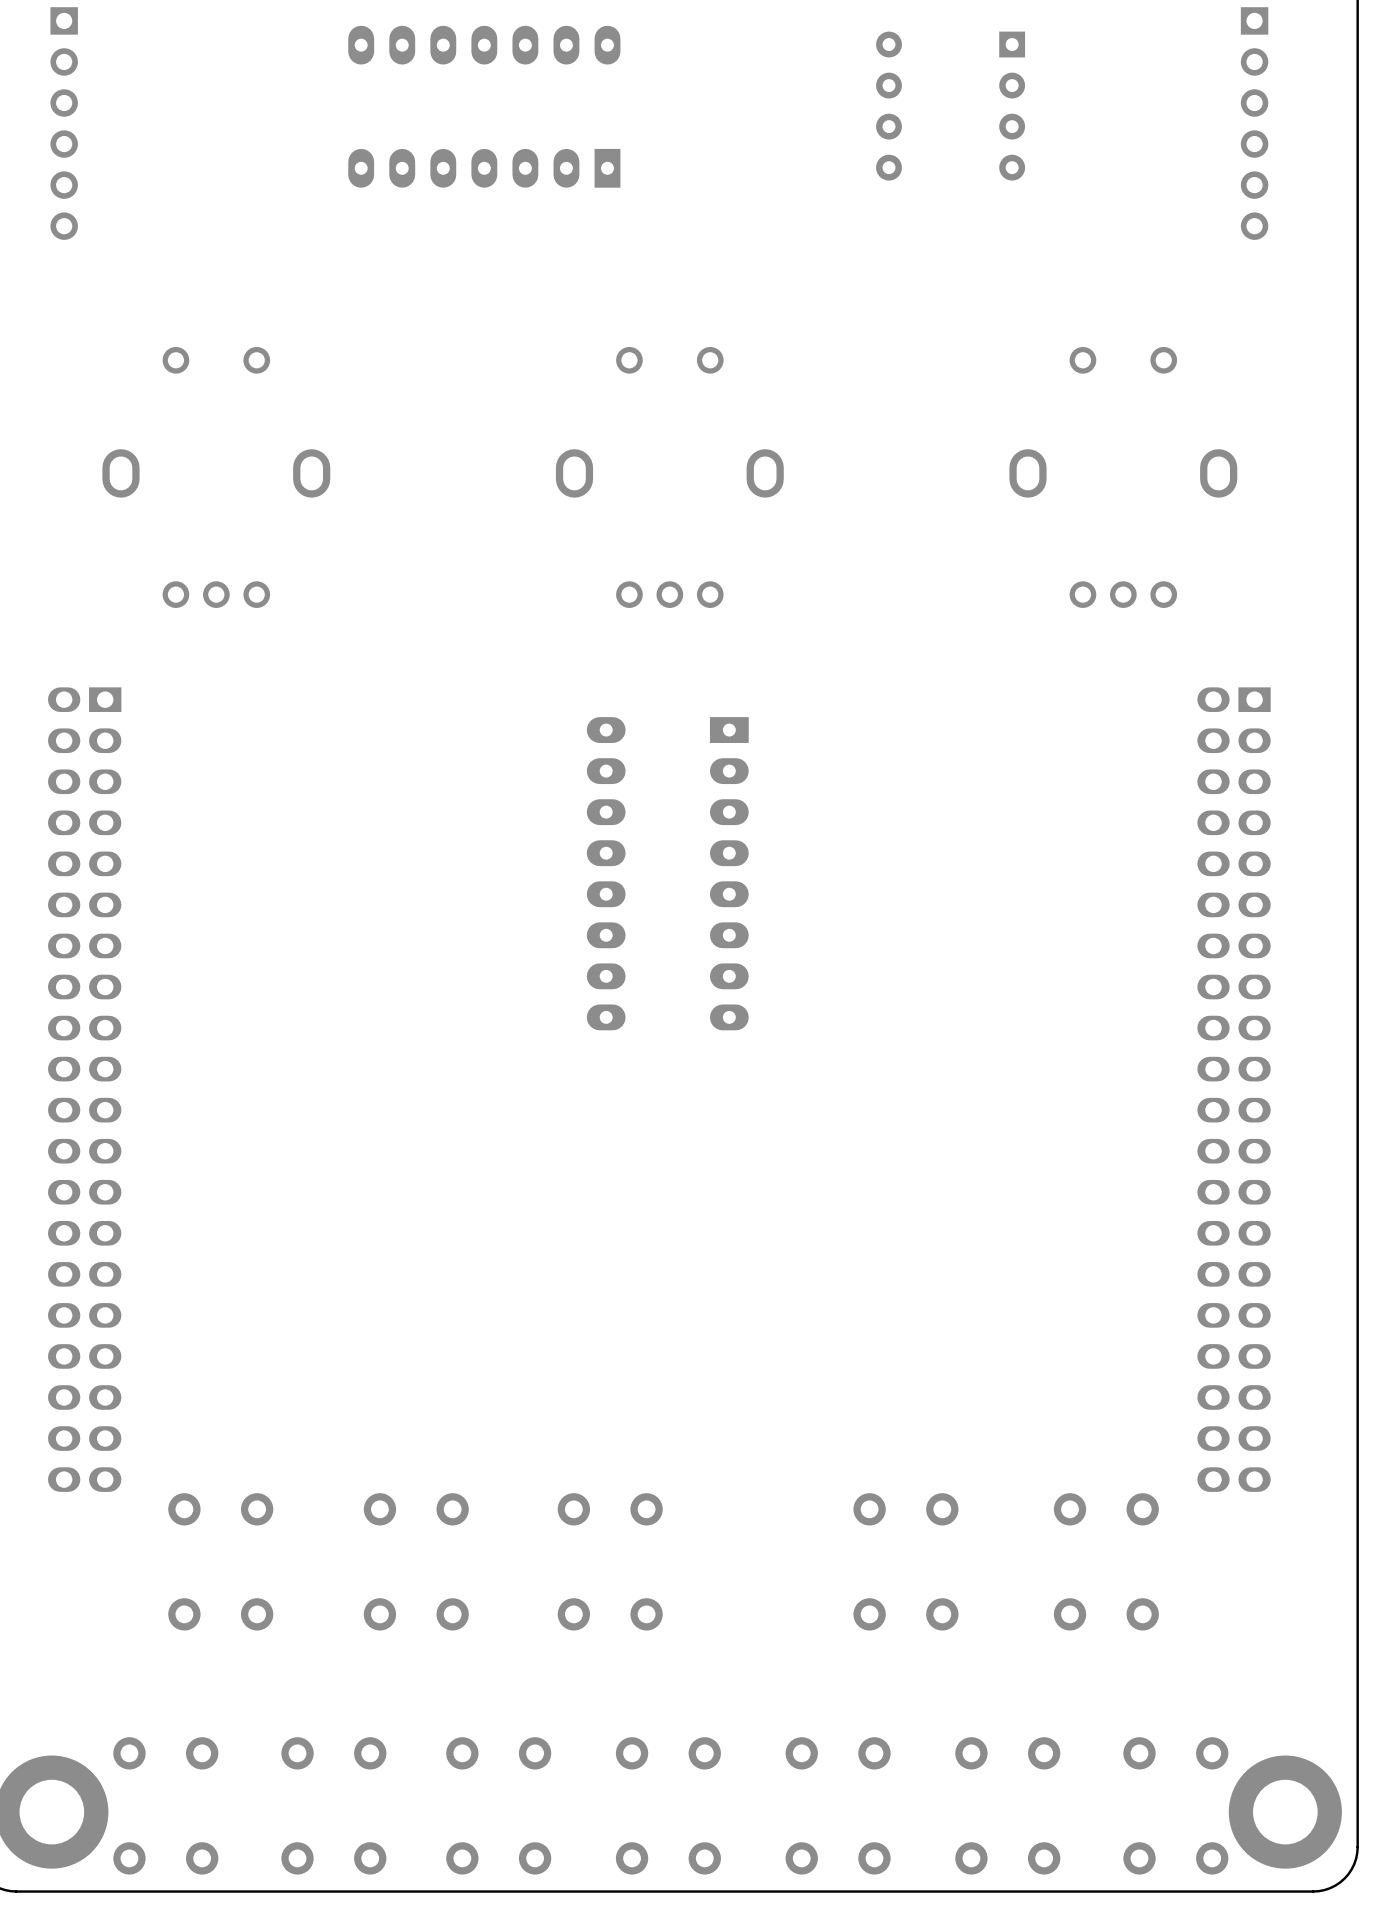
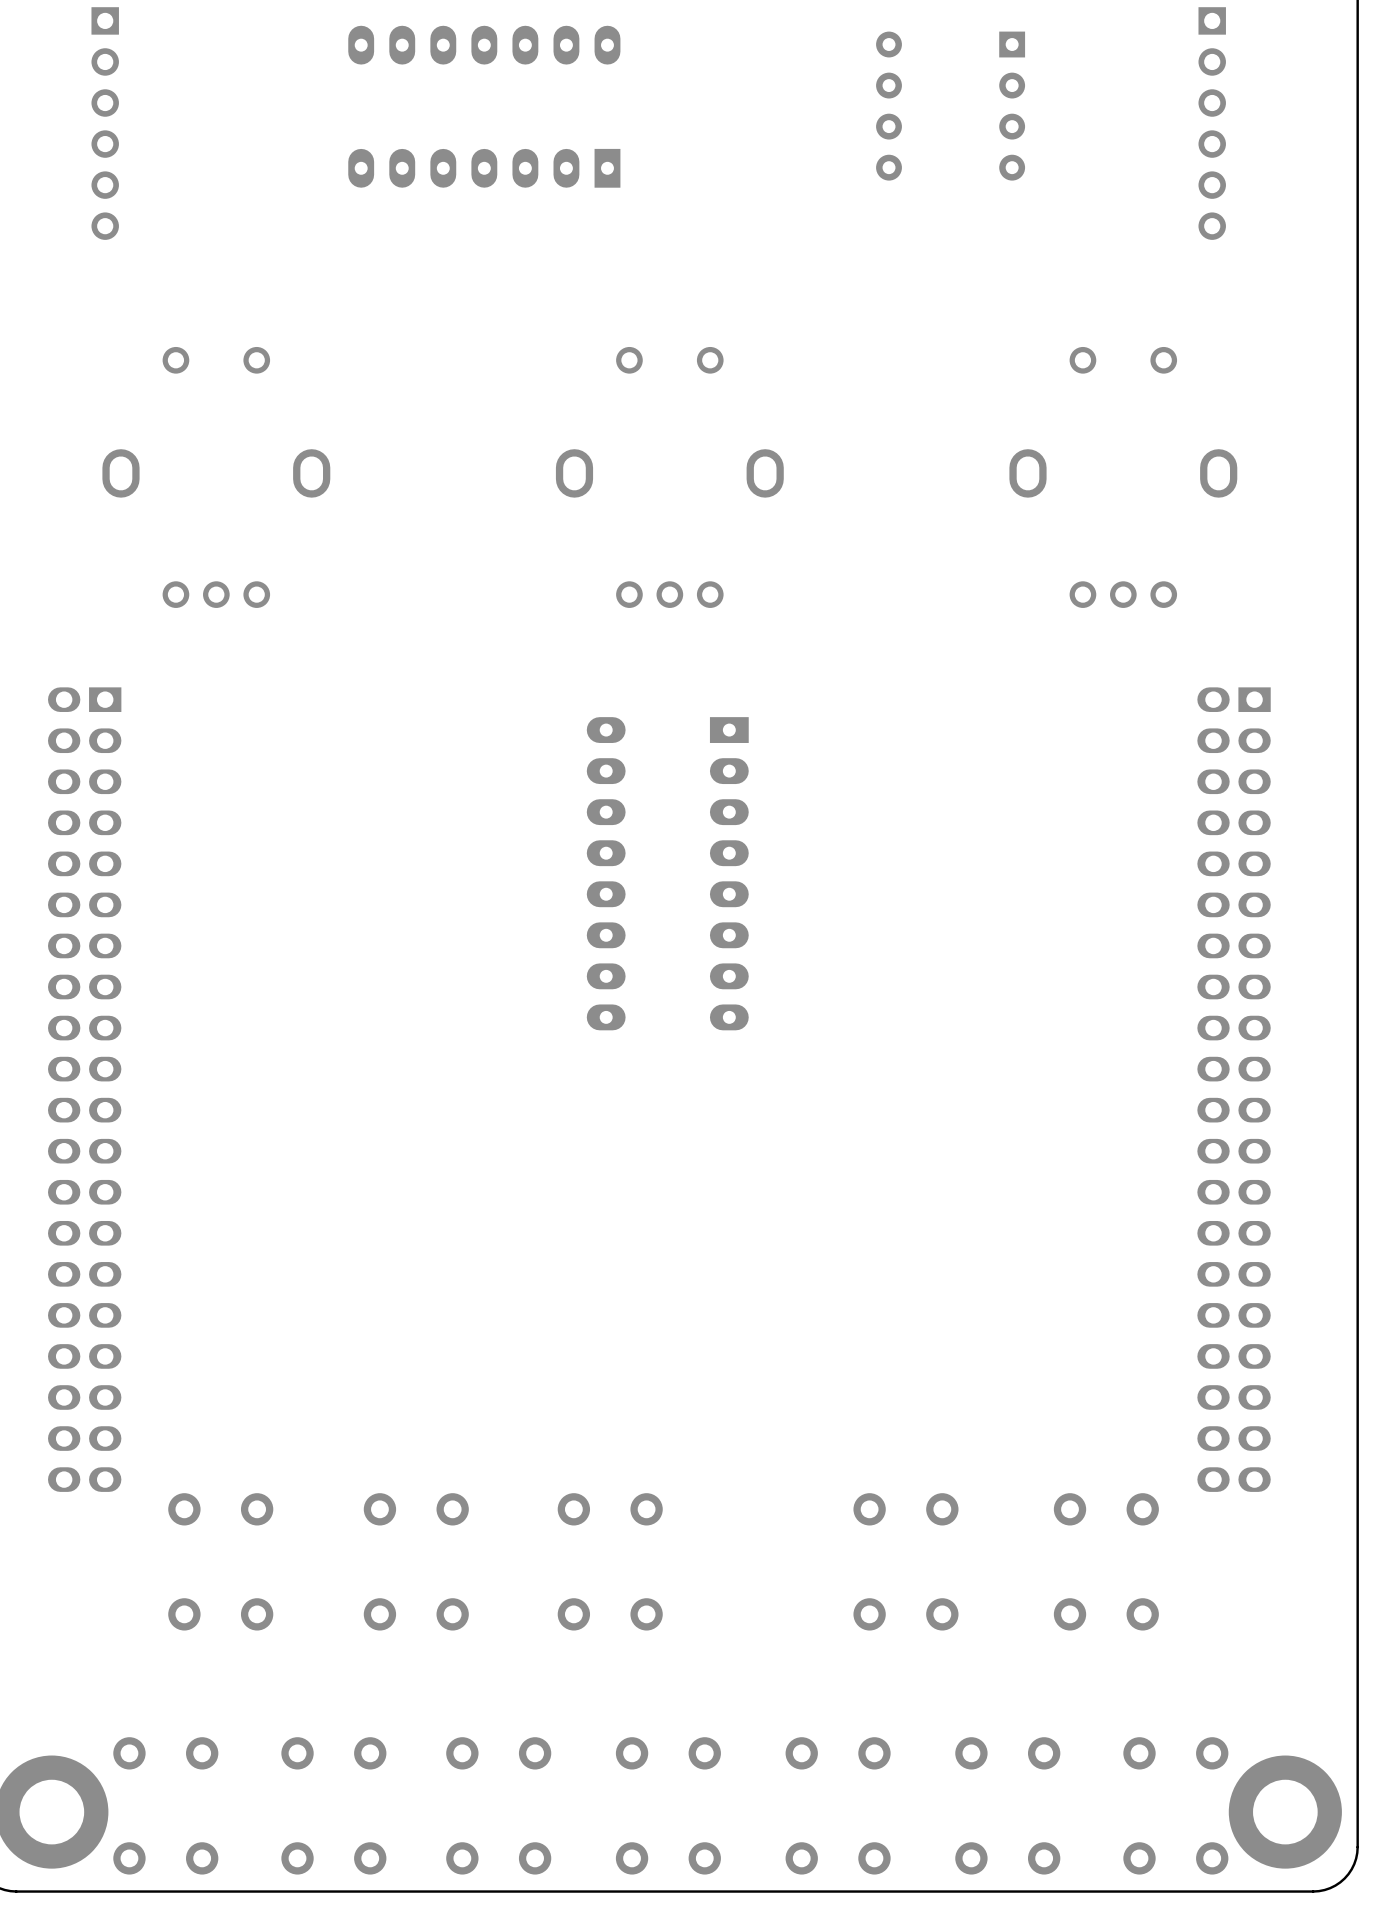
part position: (64, 123) -> (105, 123)
part position: (1254, 123) -> (1212, 123)

